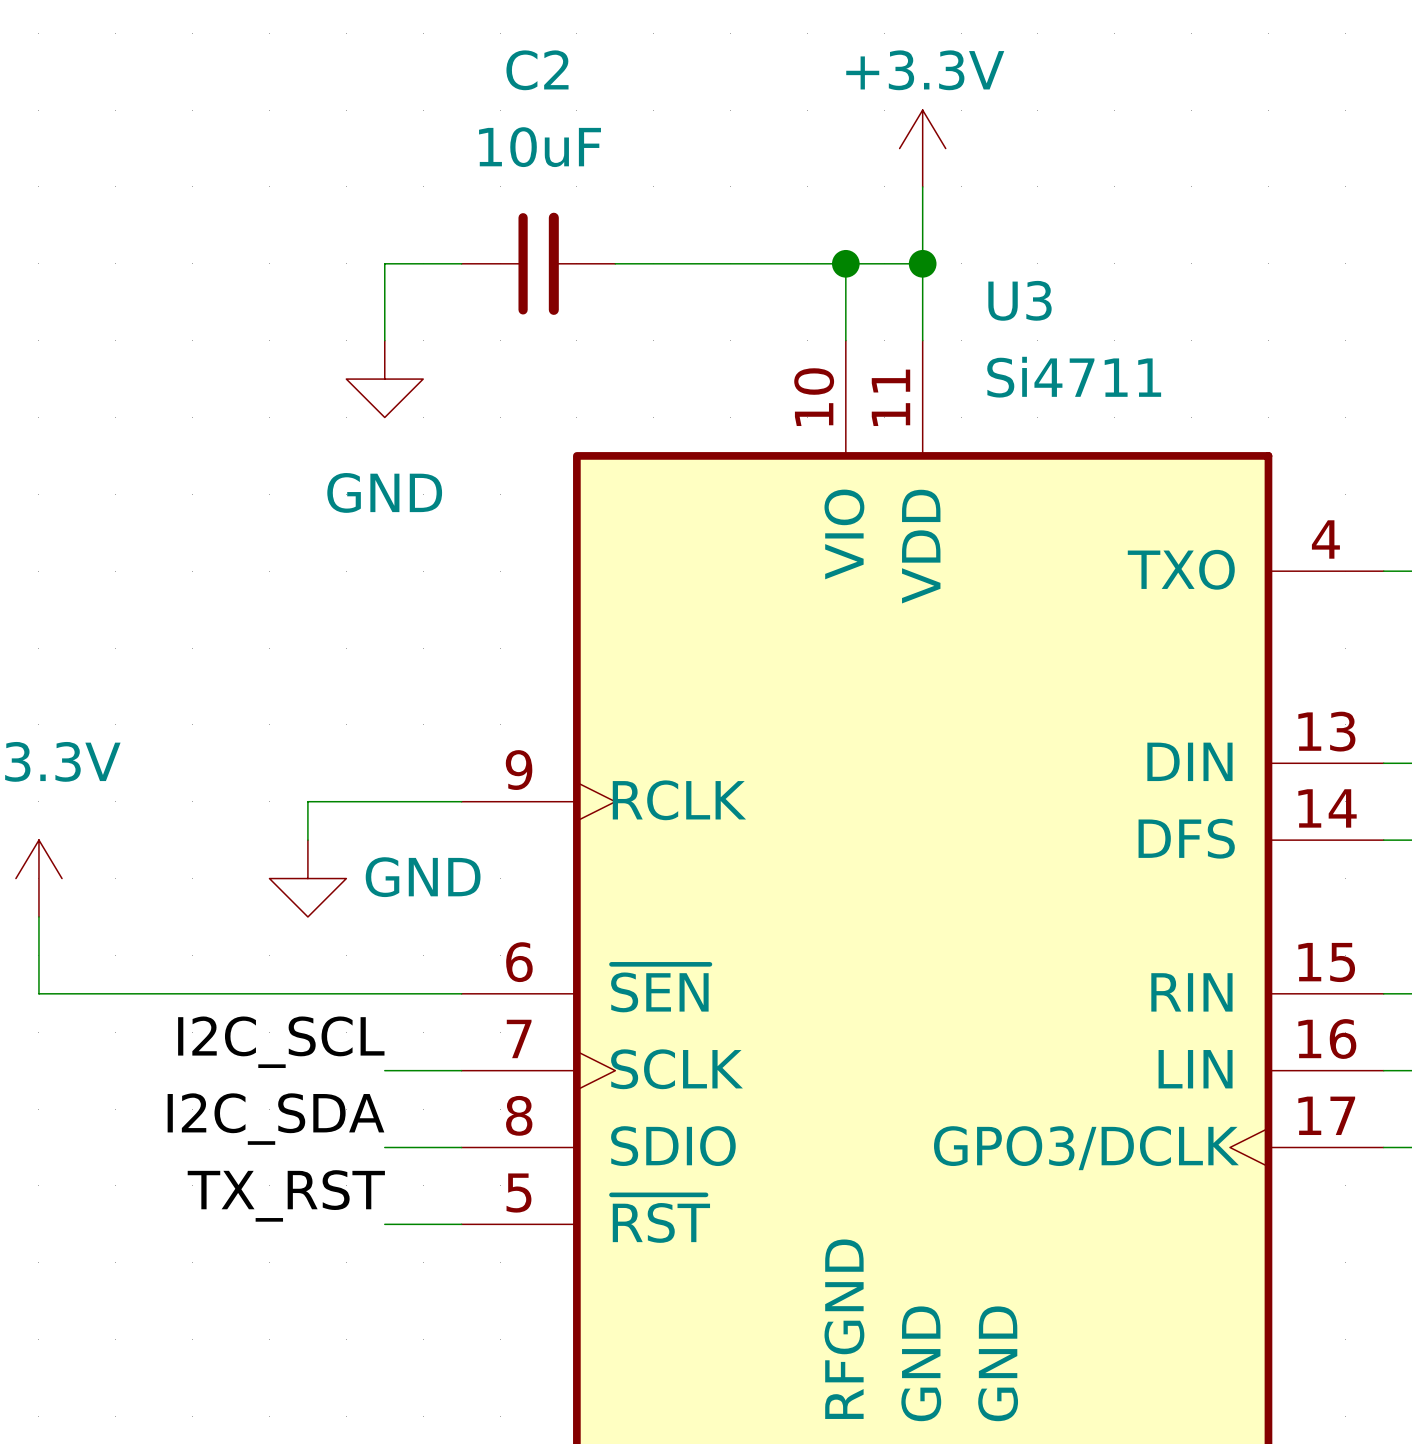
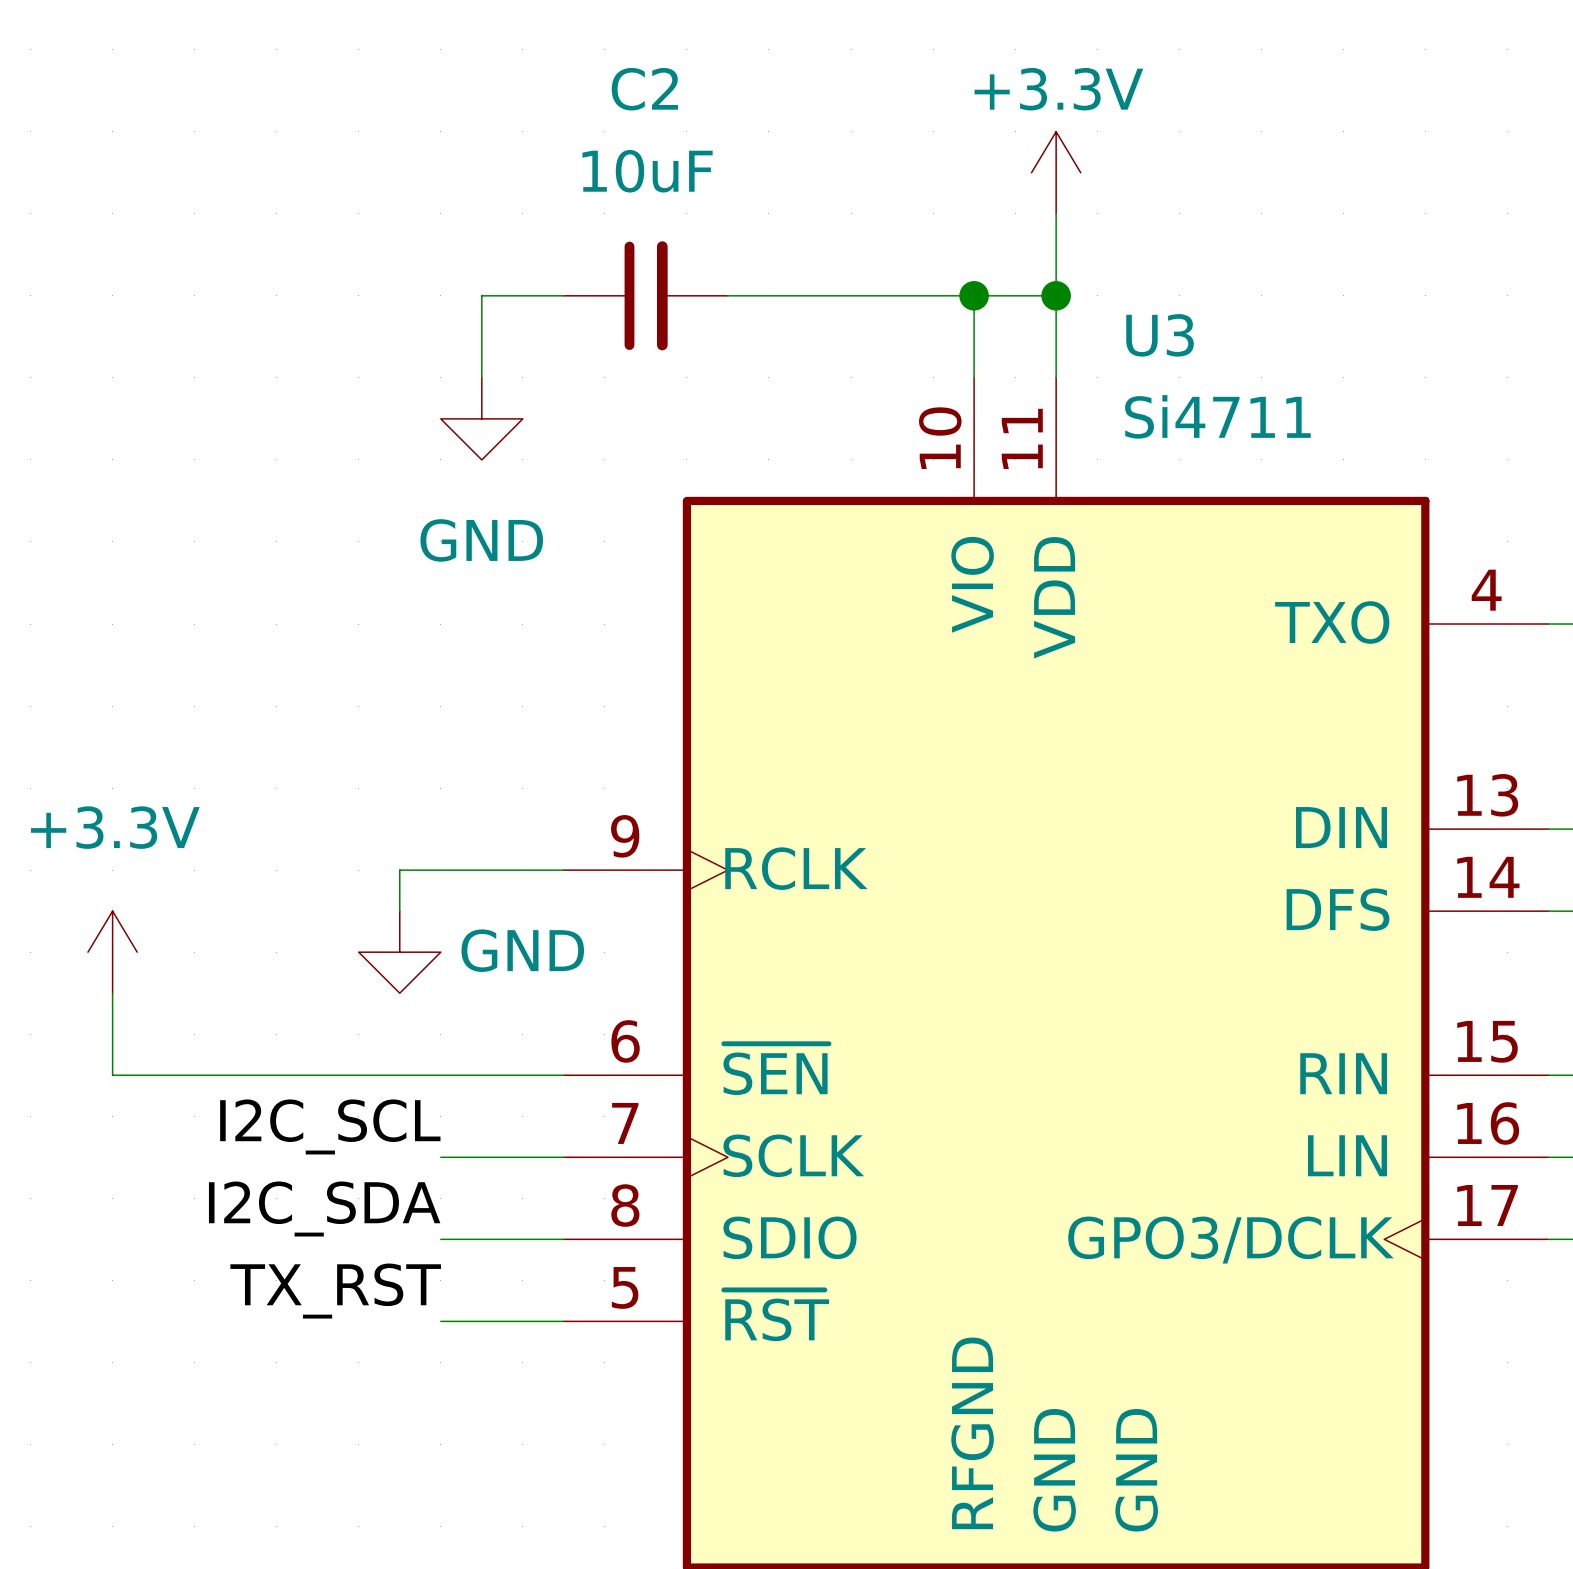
label position: I2C_SCL (281, 1042) -> I2C_SCL (330, 1126)
wire: none -> (440, 1157) (481, 1157)
label position: I2C_SDA (275, 1119) -> I2C_SDA (324, 1209)
wire: none -> (440, 1239) (481, 1239)
label position: TX_RST (286, 1195) -> TX_RST (335, 1291)
wire: none -> (440, 1321) (481, 1321)

